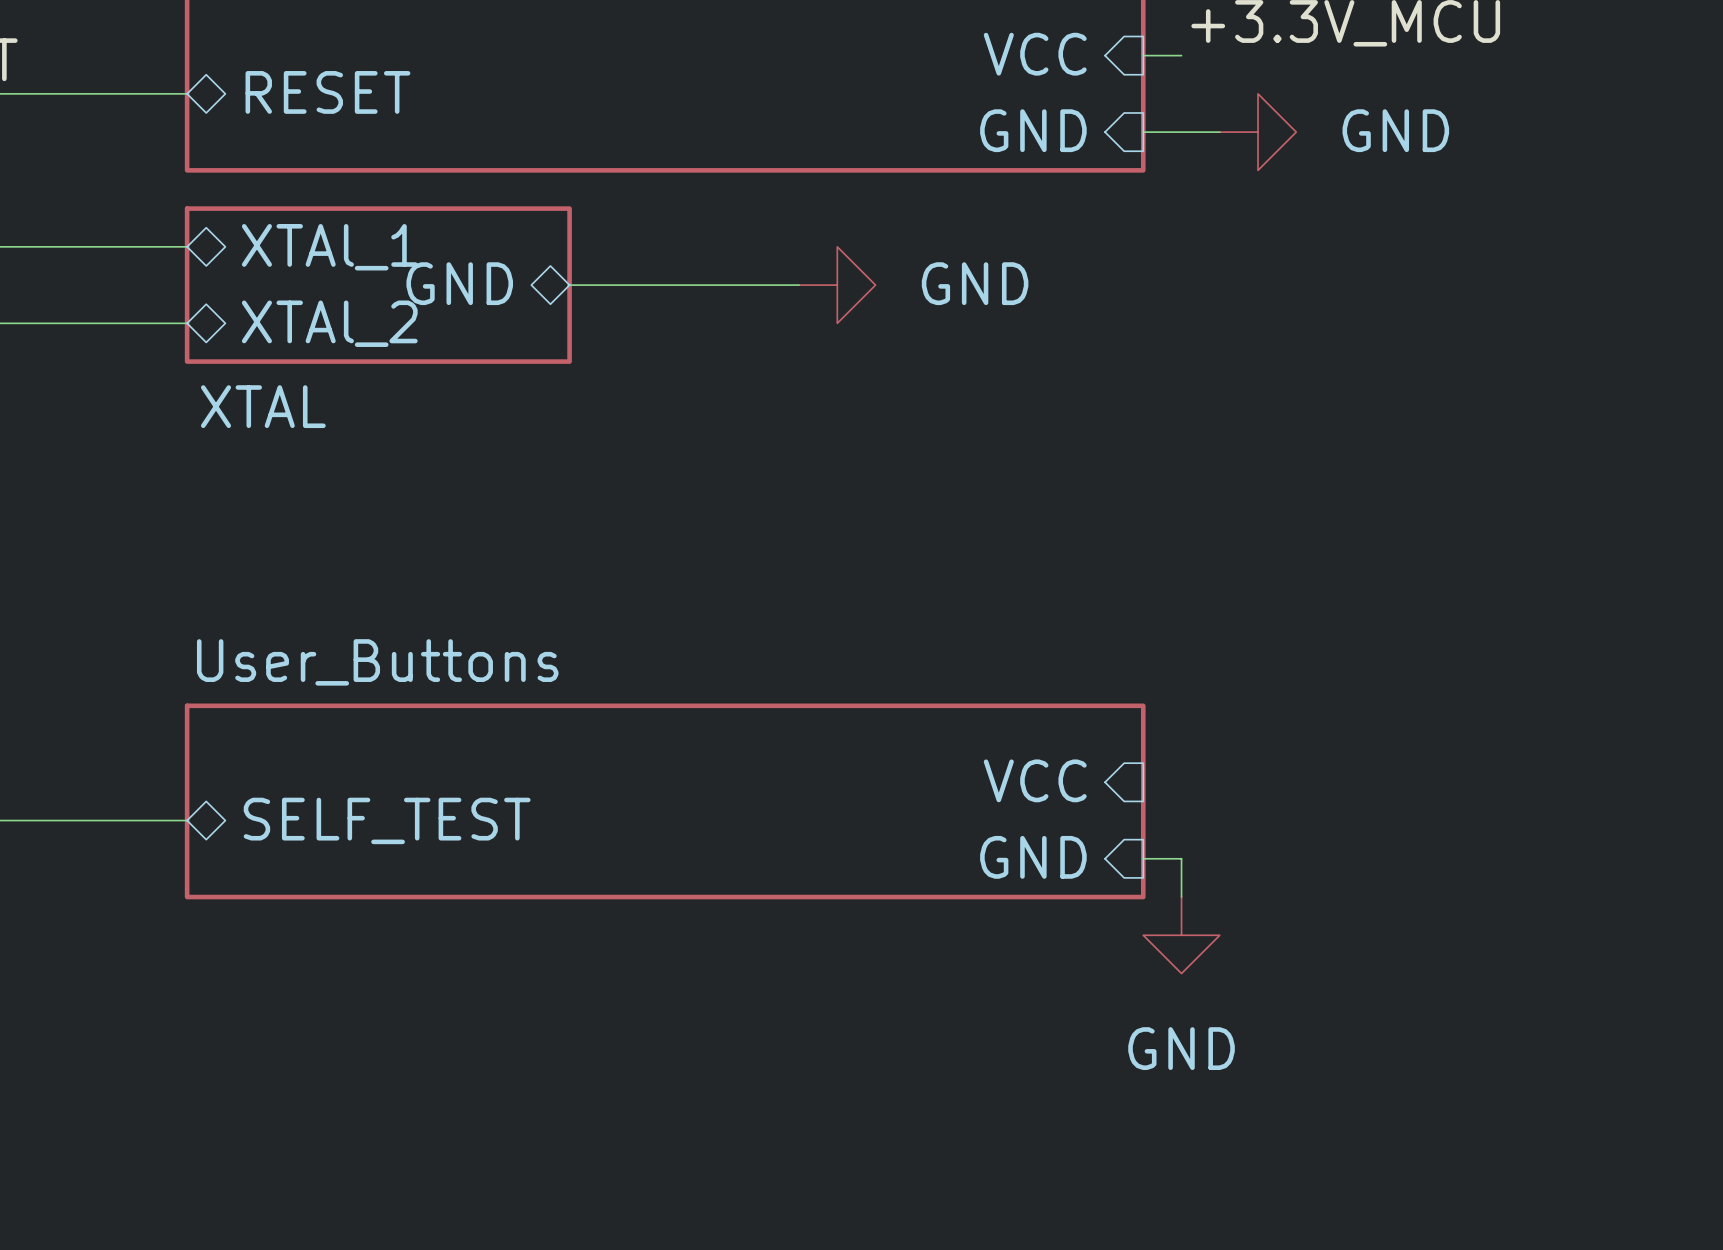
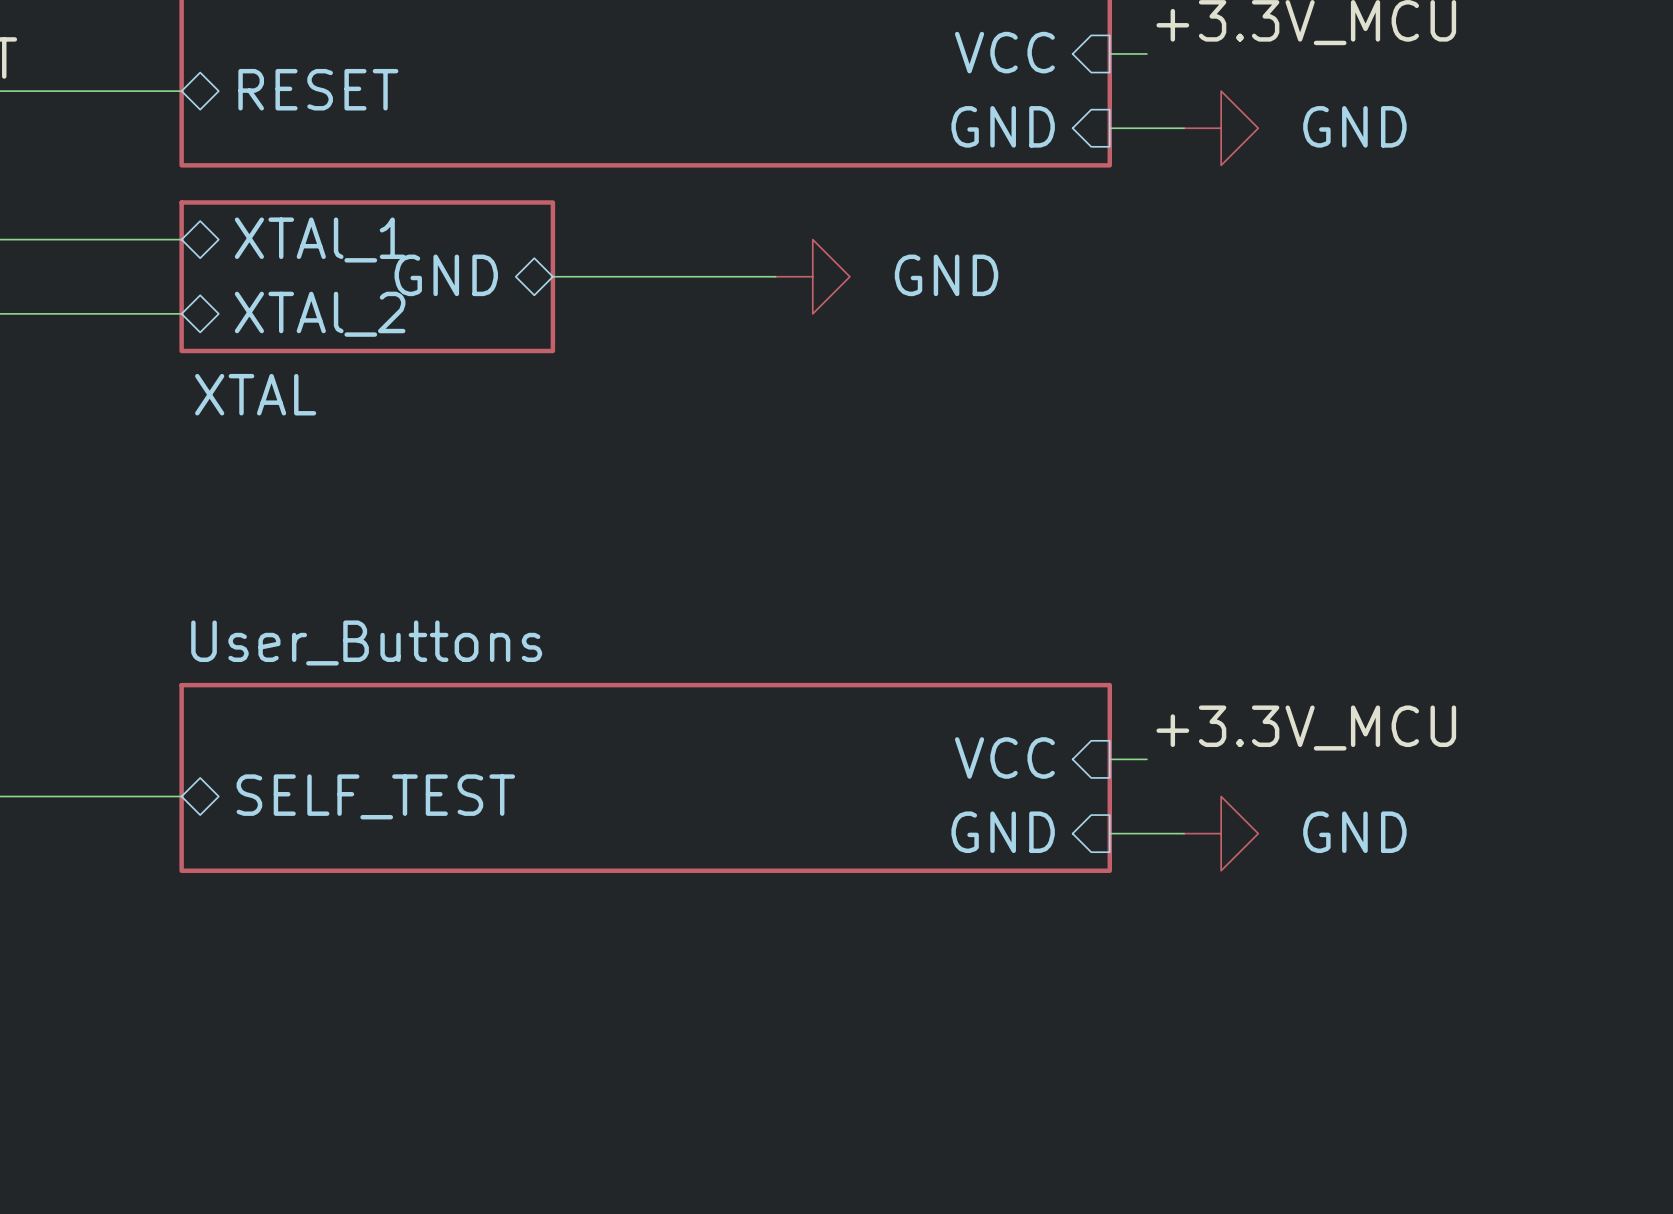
label: none -> +3.3V_MCU (1306, 728)
wire: none -> (1109, 759) (1146, 759)
wire: (1181, 858) (1181, 897) -> (1146, 833) (1184, 833)
power symbol rotation: 0° (1181, 935) -> 90° counterclockwise (1221, 833)
power symbol position: GND (1181, 935) -> GND (1221, 833)

